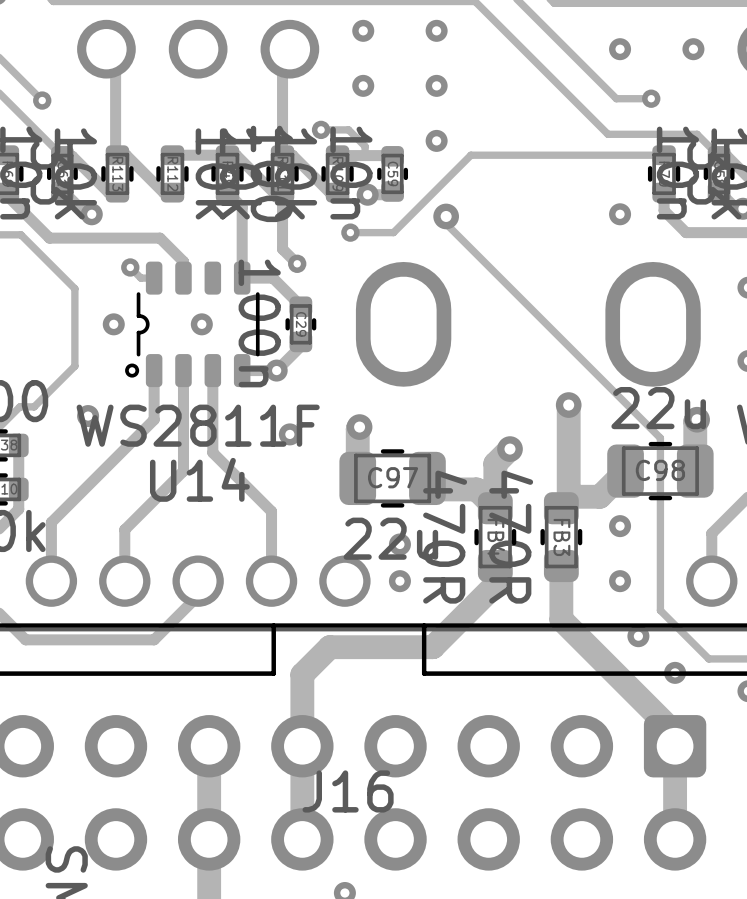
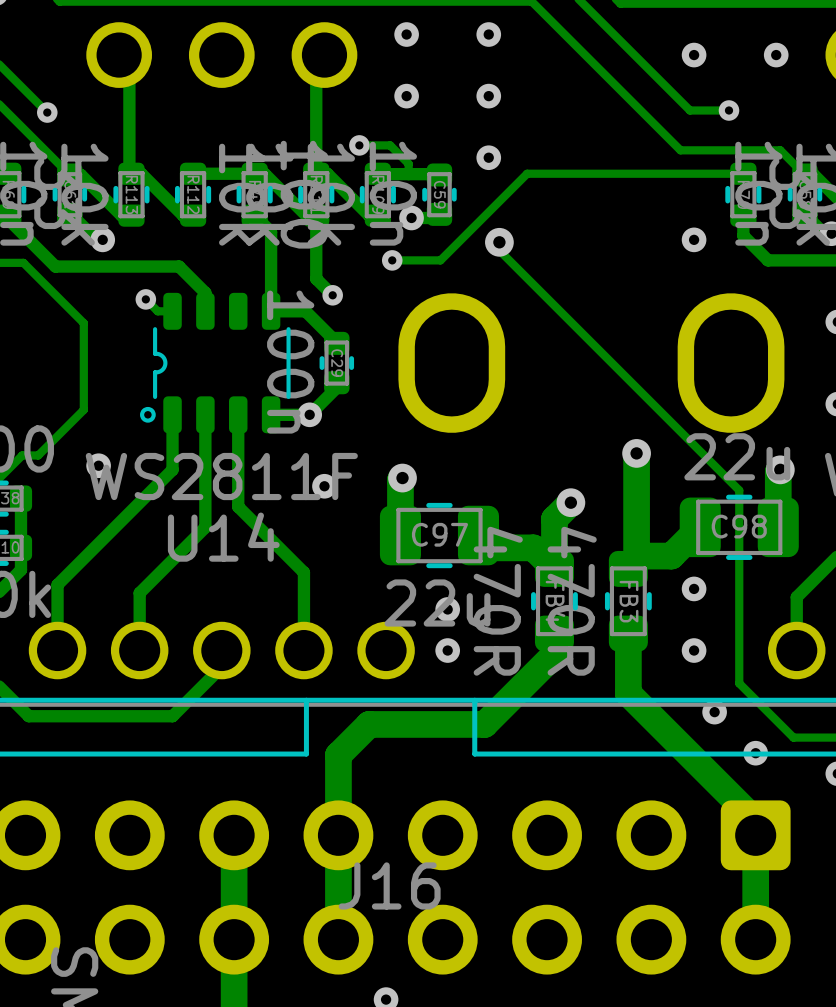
via: (113, 324) -> none
via: (201, 324) -> none

